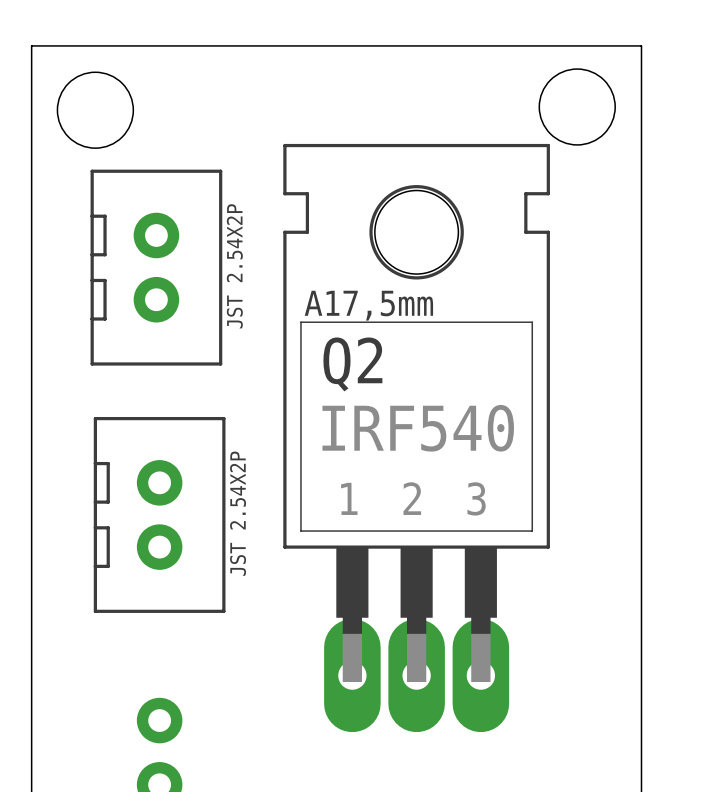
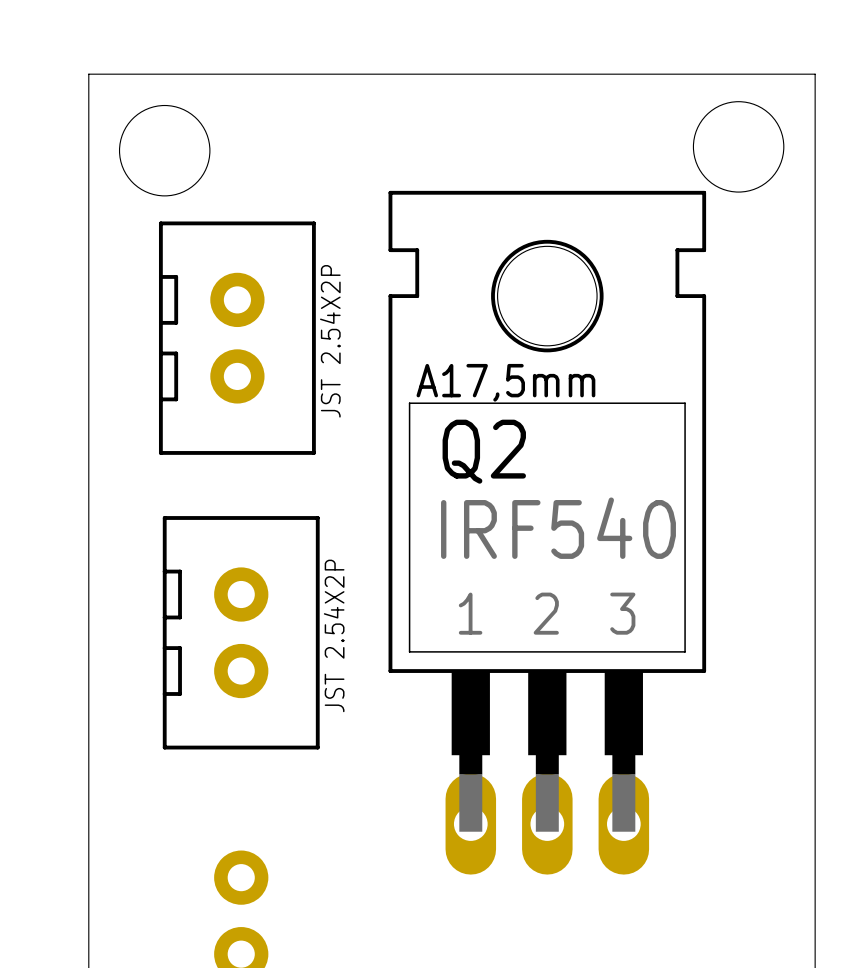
Q2 footprint: [283, 143, 550, 733] -> [388, 190, 707, 875]

